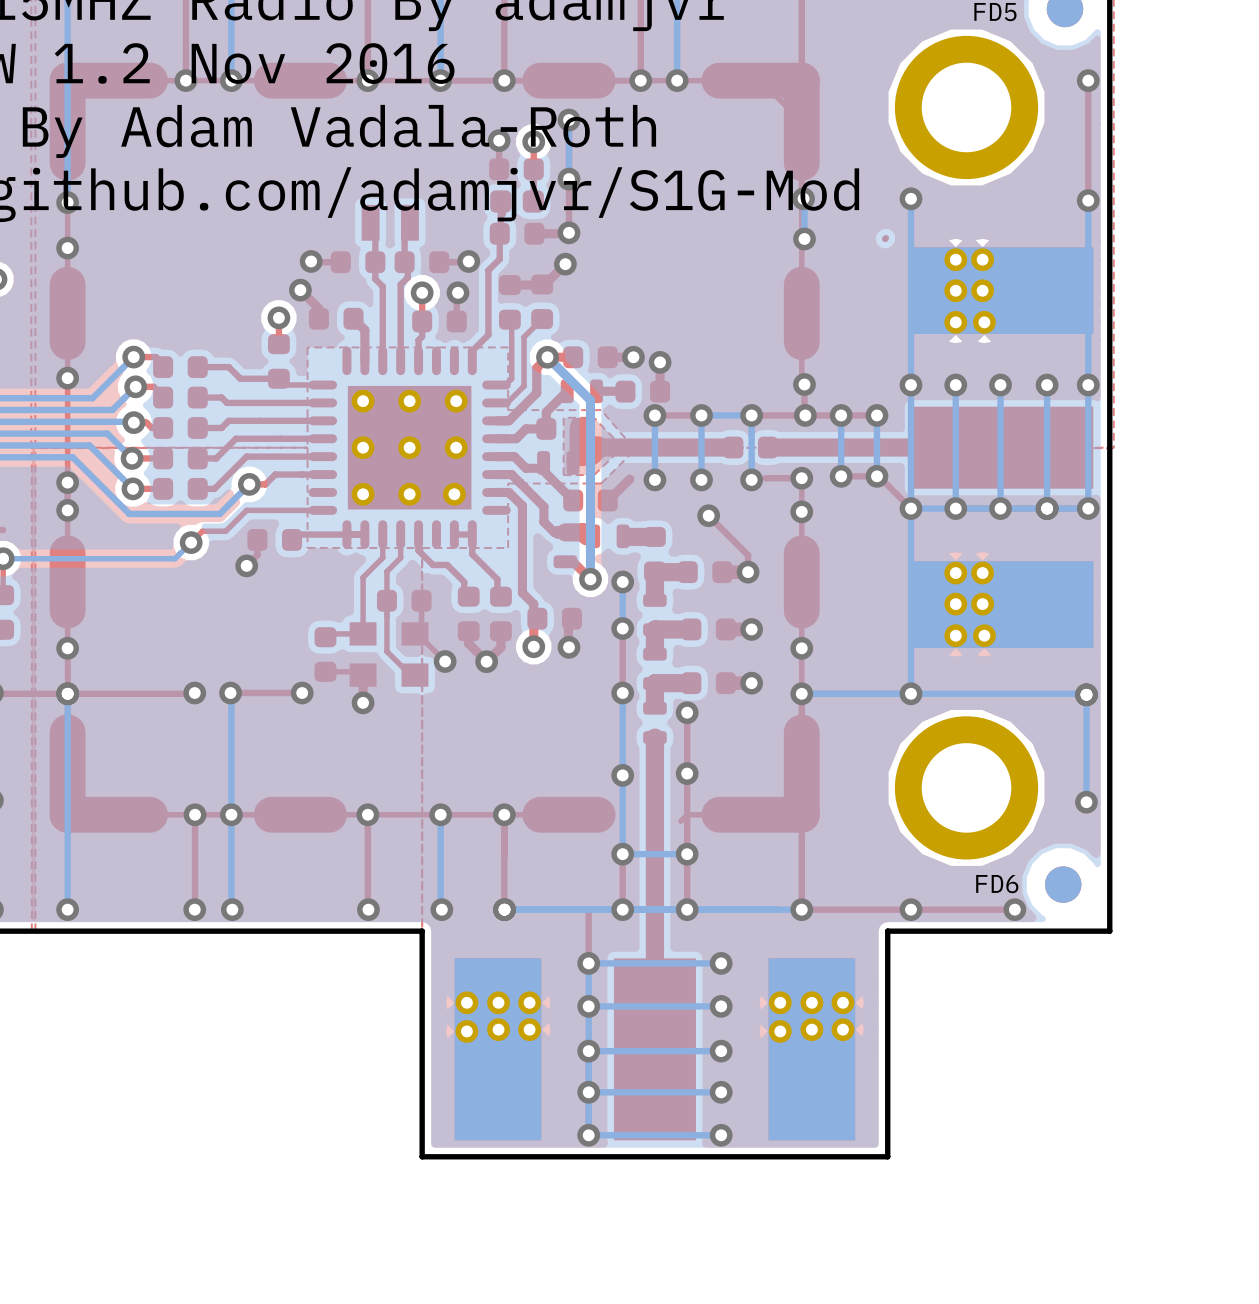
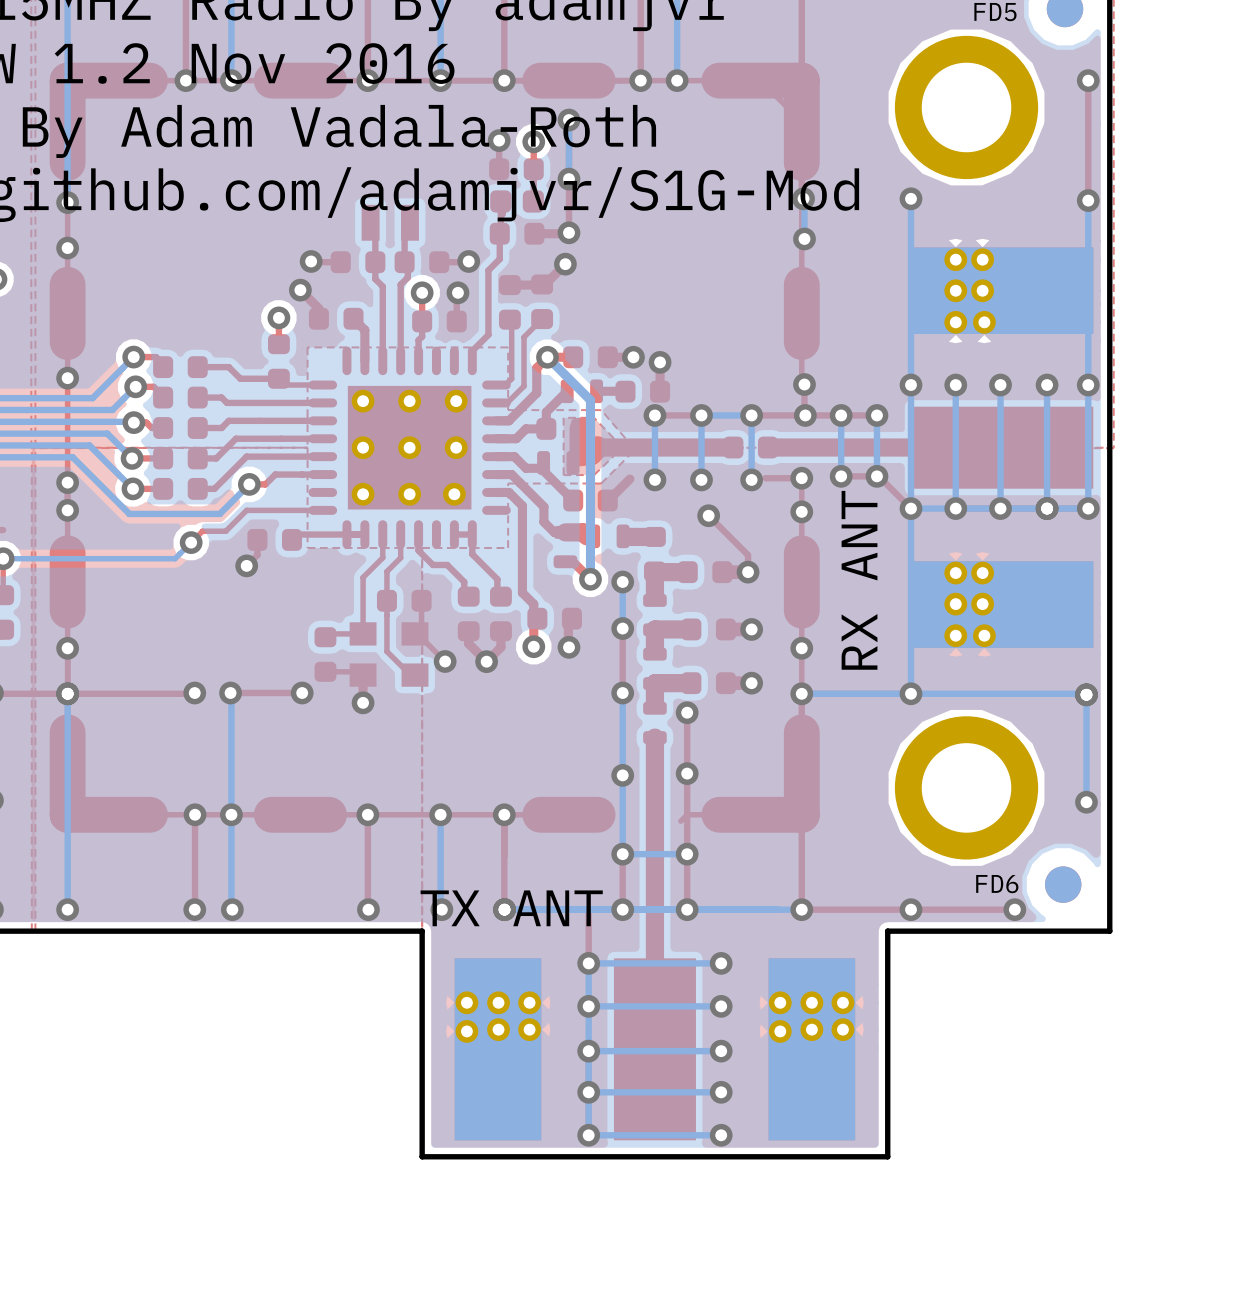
top track: (885, 238) (885, 238) -> none
text: none -> RX ANT (859, 580)
text: none -> TX ANT (511, 908)

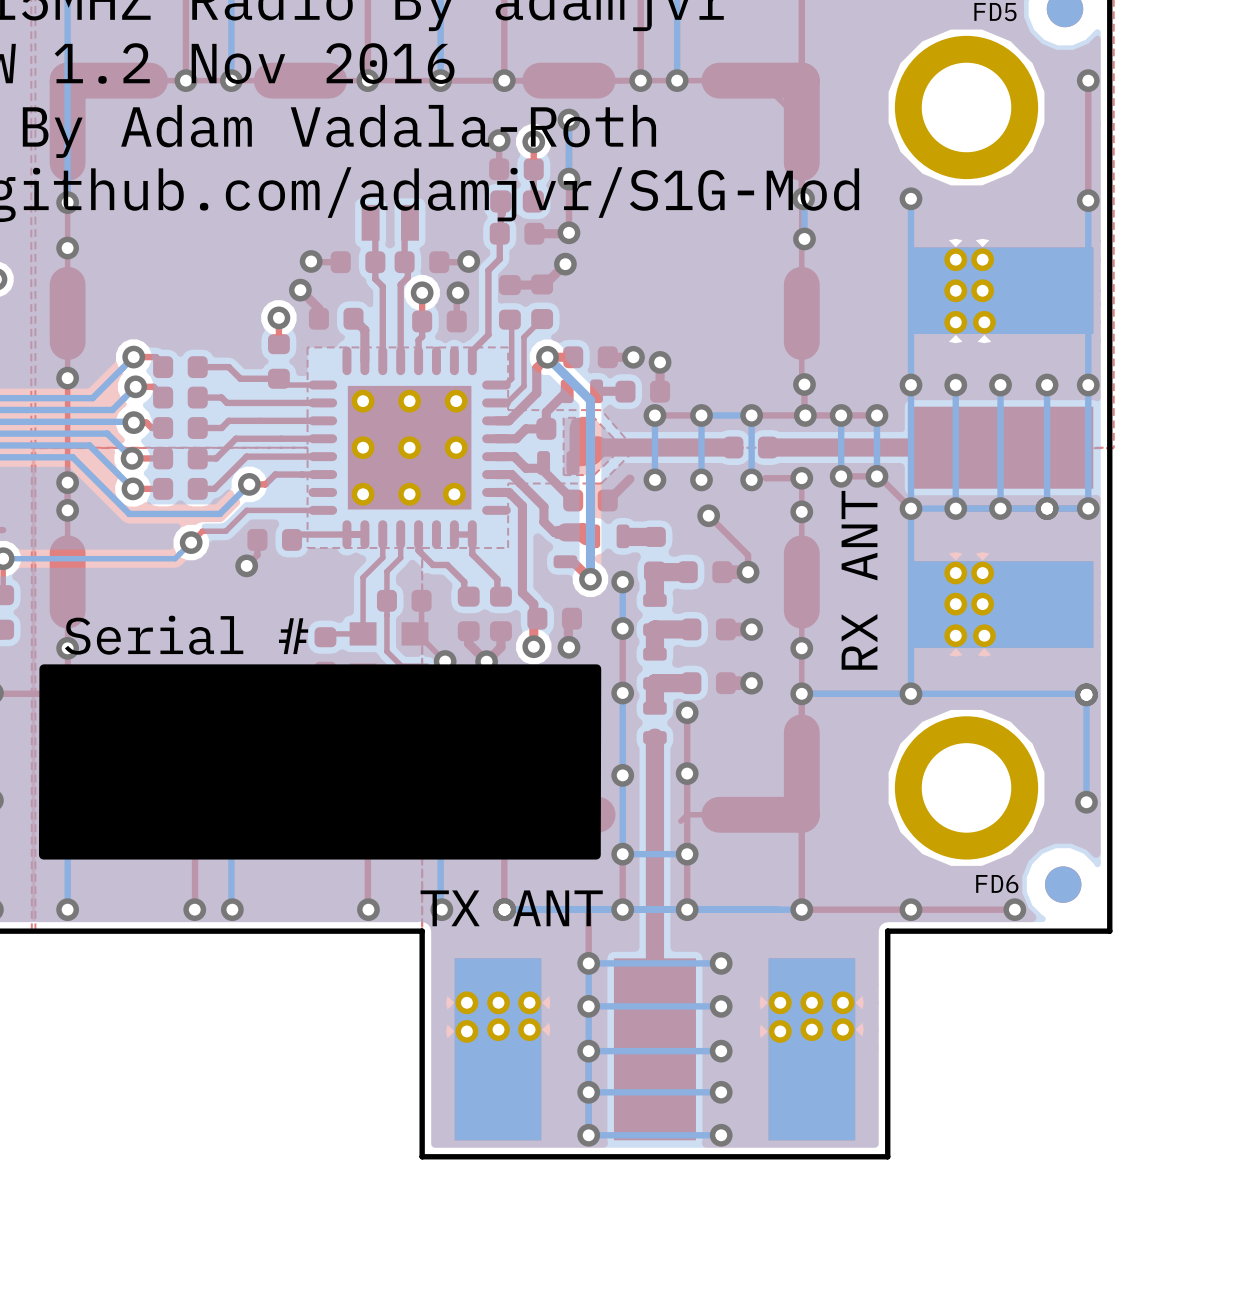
text: none -> Serial # (186, 635)
drawing: none -> [38, 664, 602, 860]

